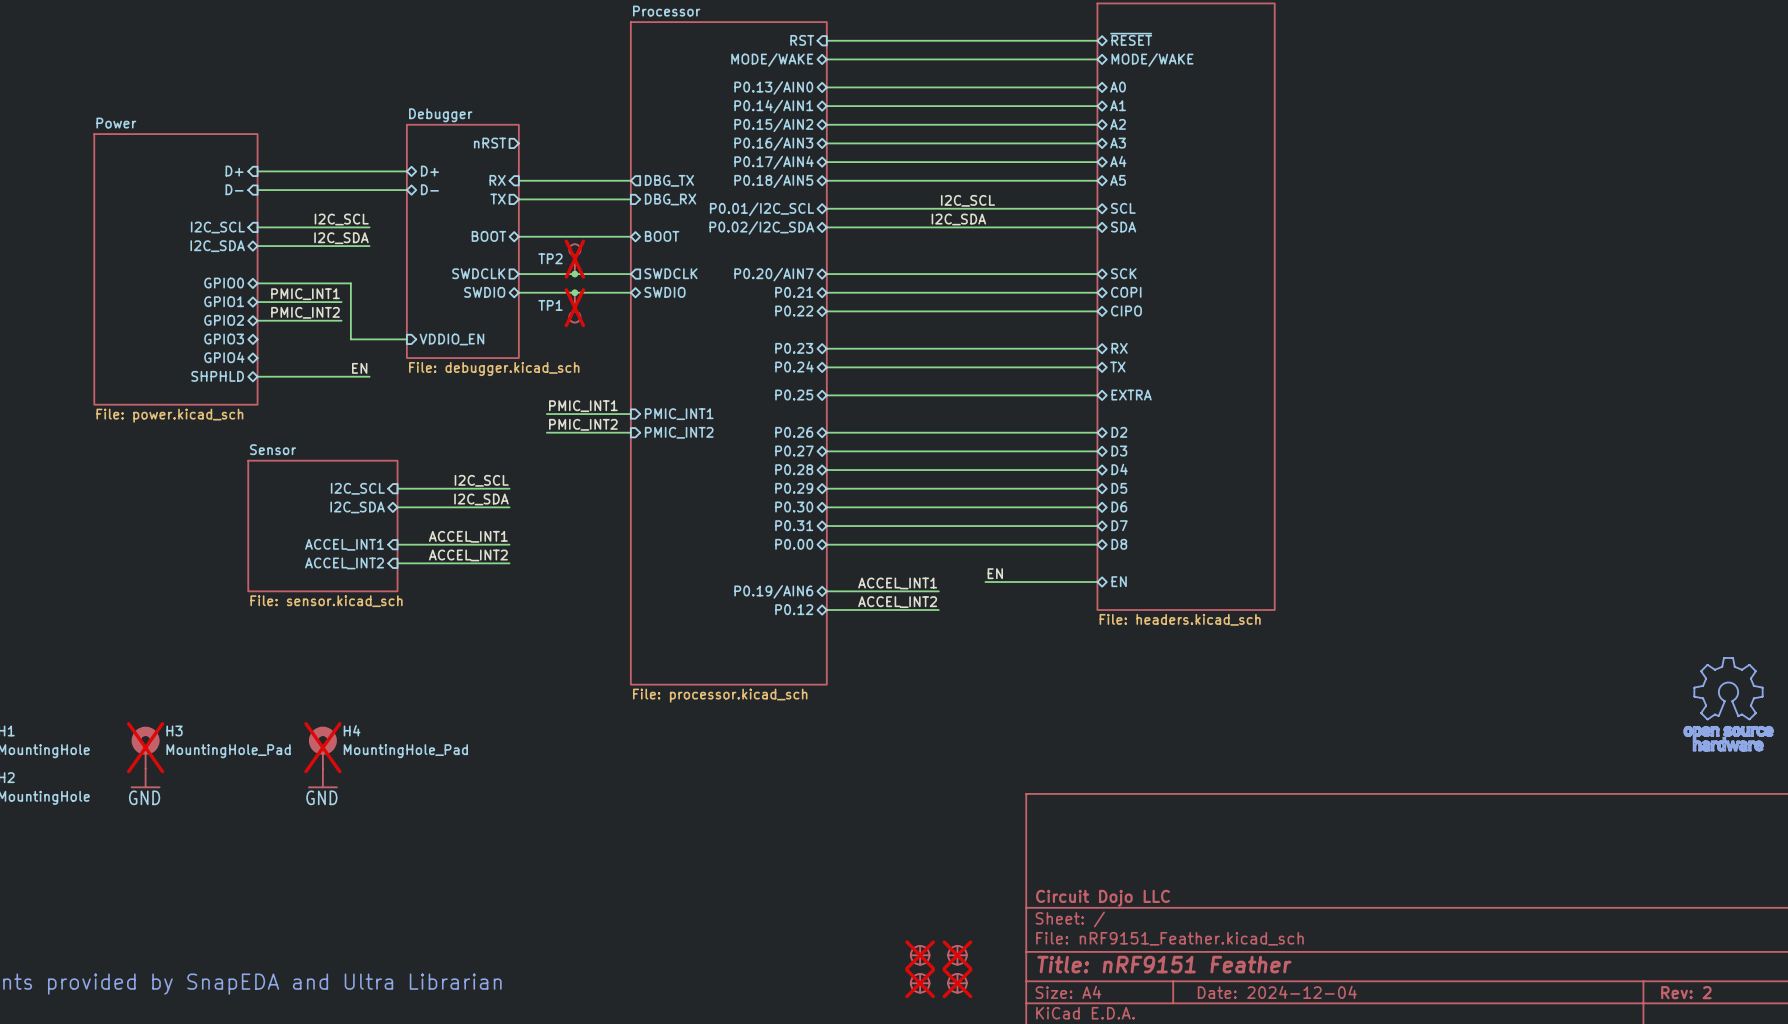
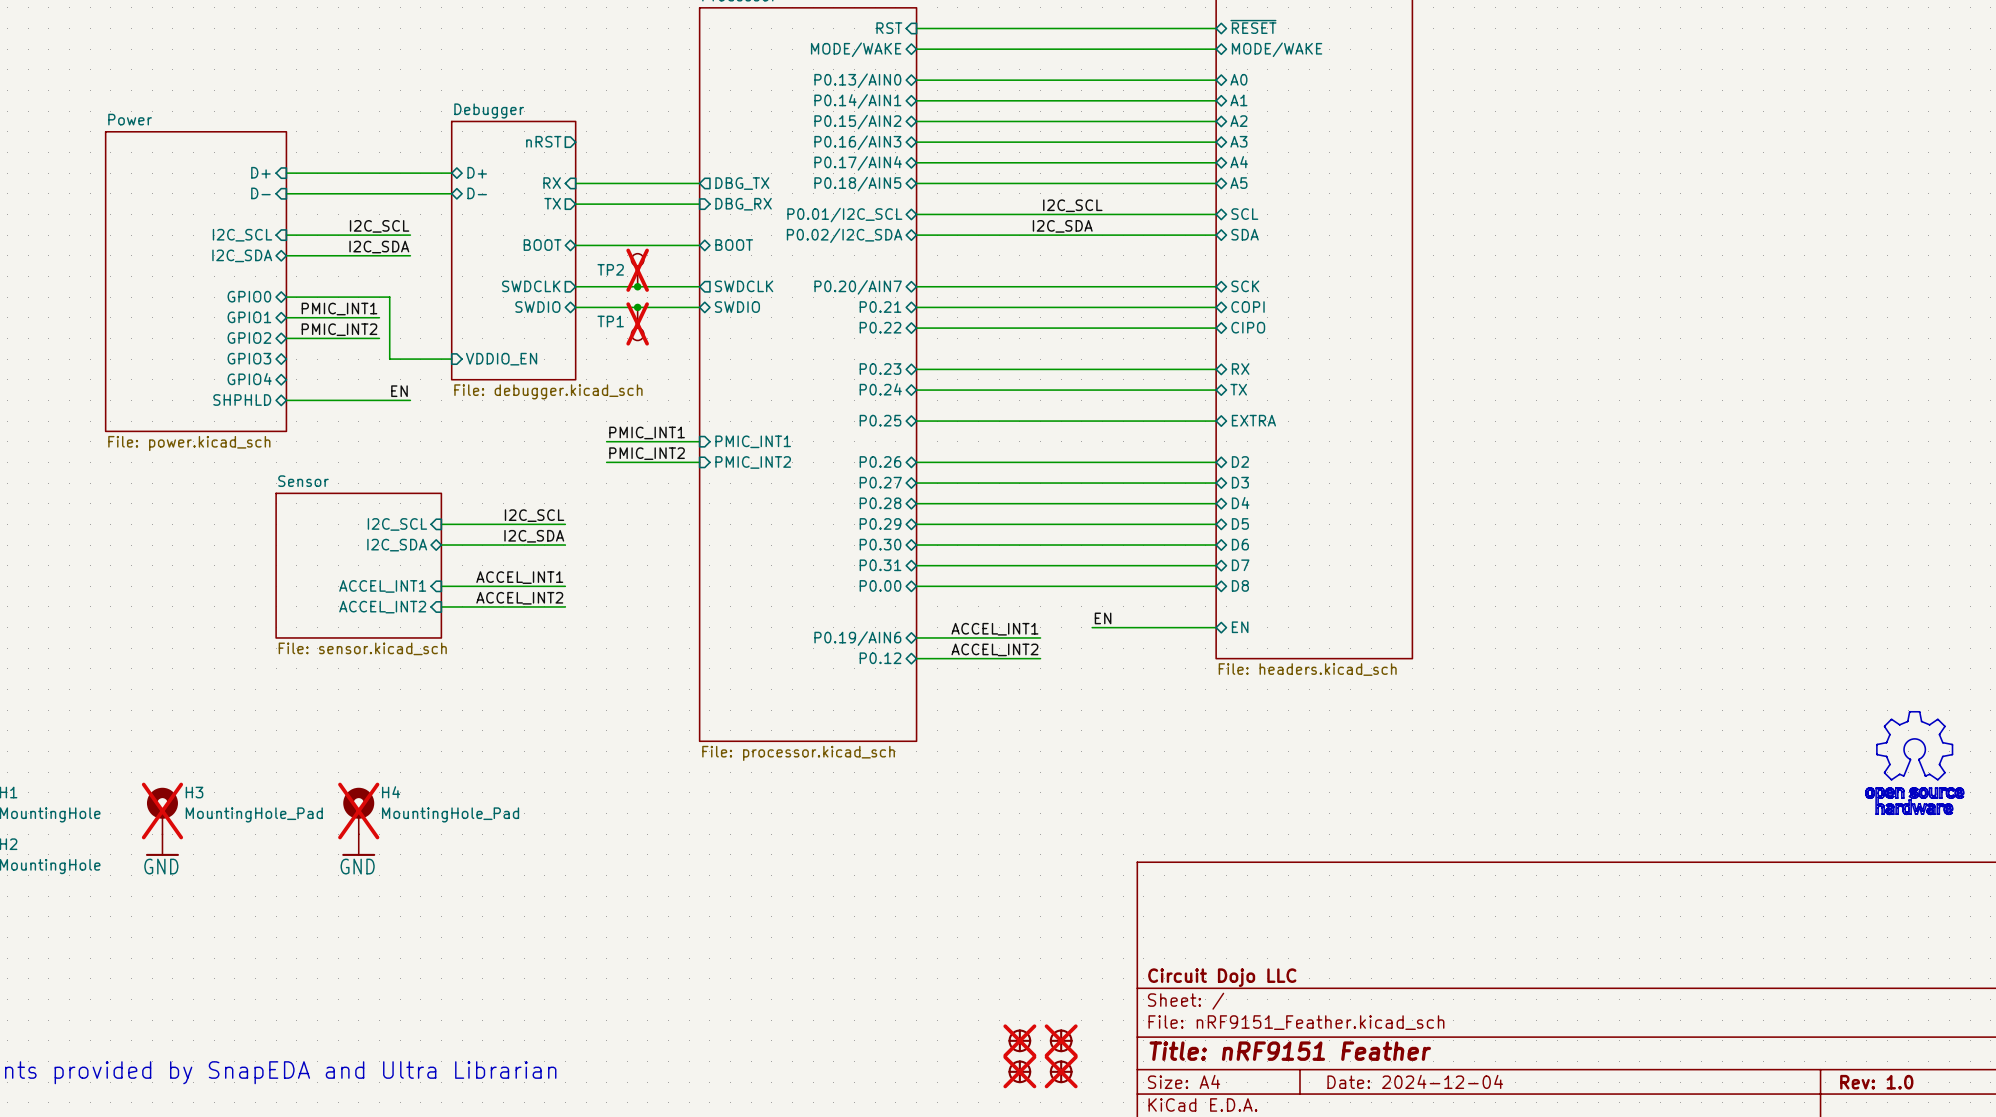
title block: Rev: 2 (1686, 992) -> Rev: 1.0 (1876, 1082)

